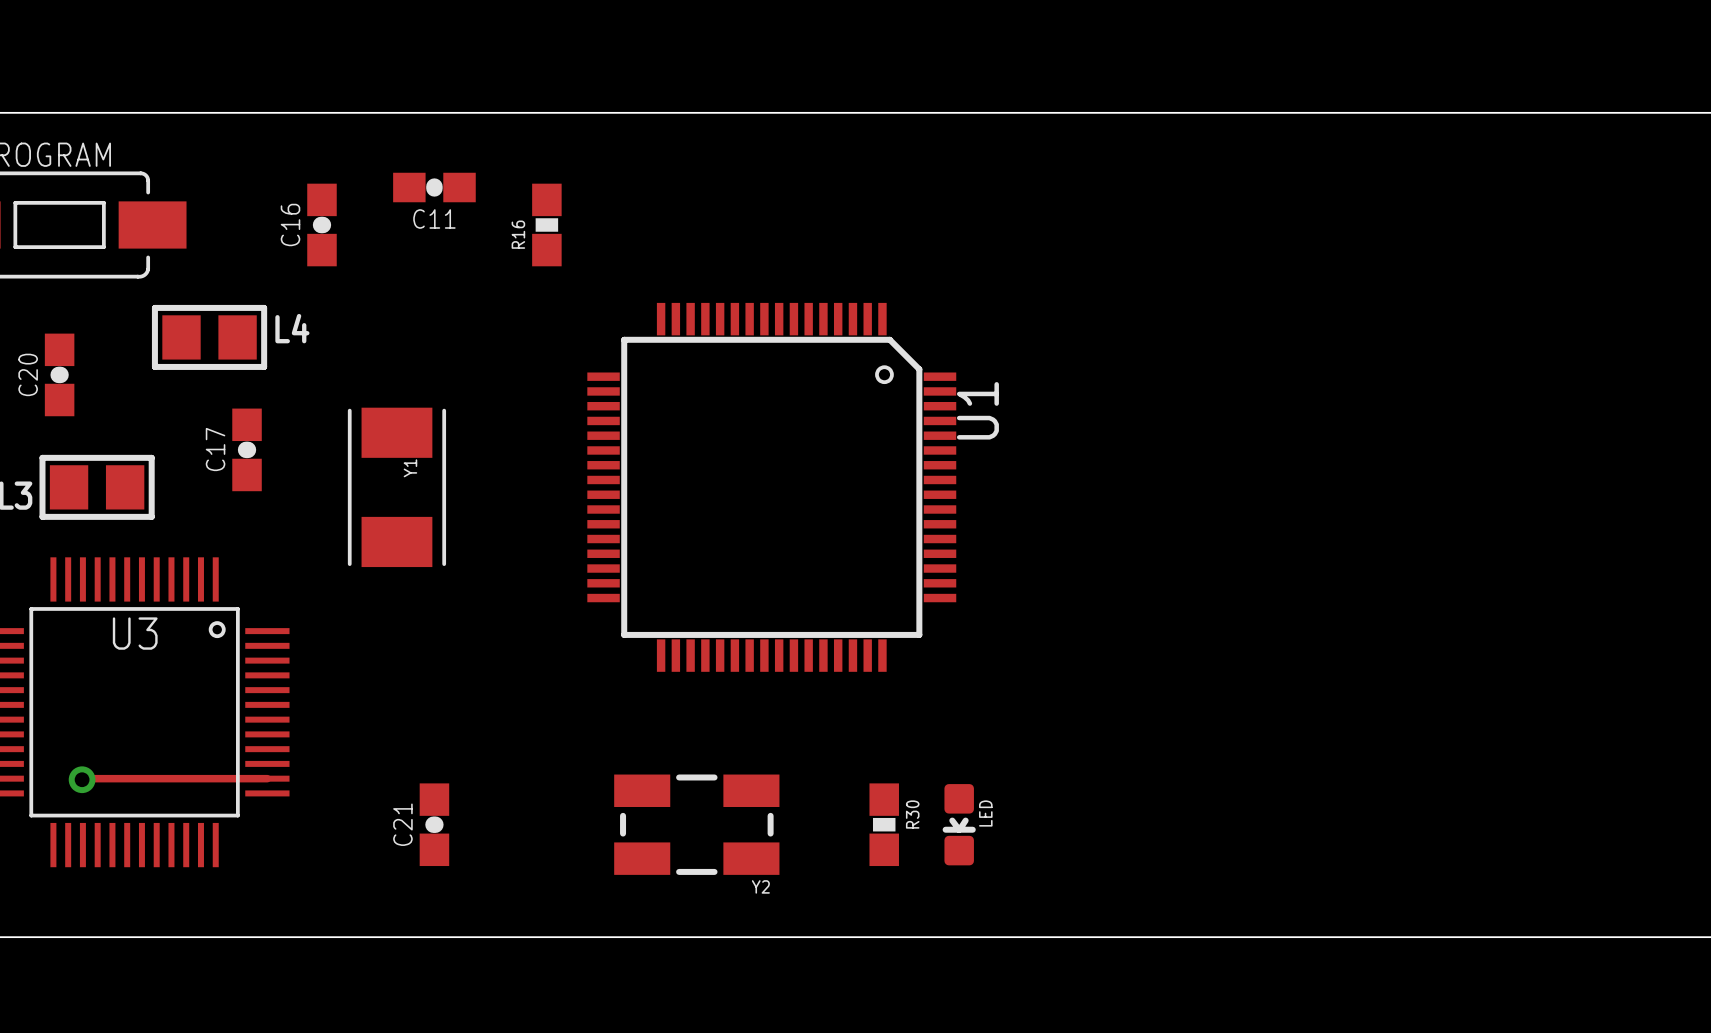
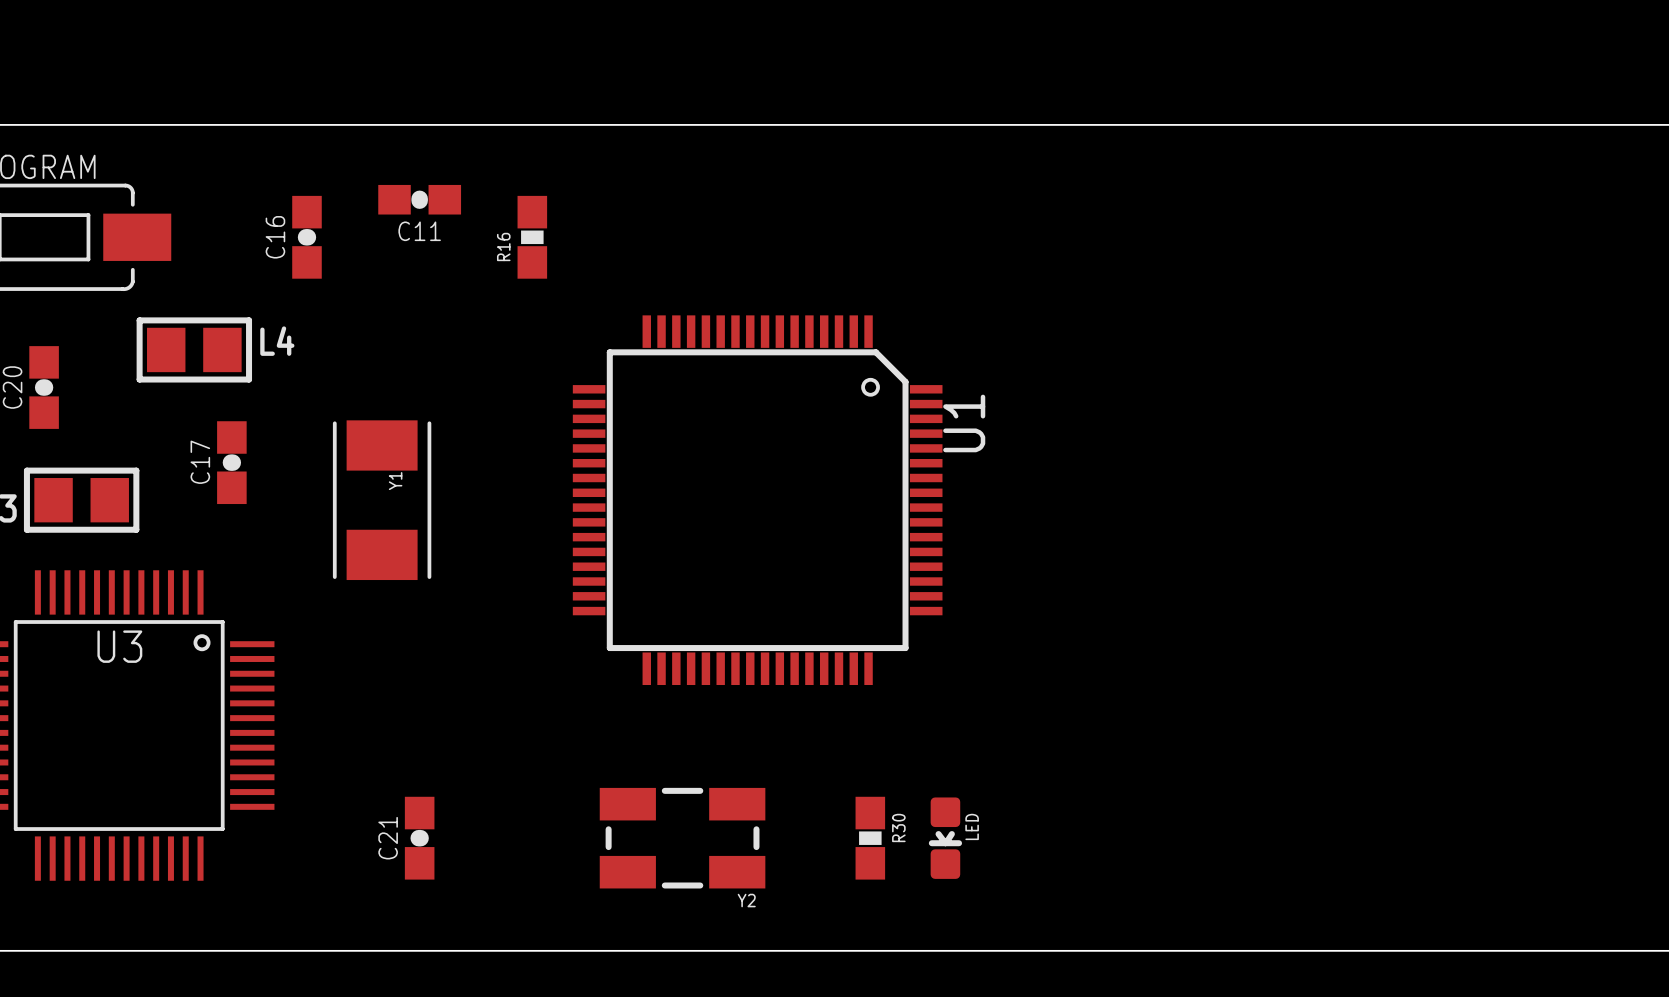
track: (267, 778) (82, 779) -> none
via: (82, 779) -> none

